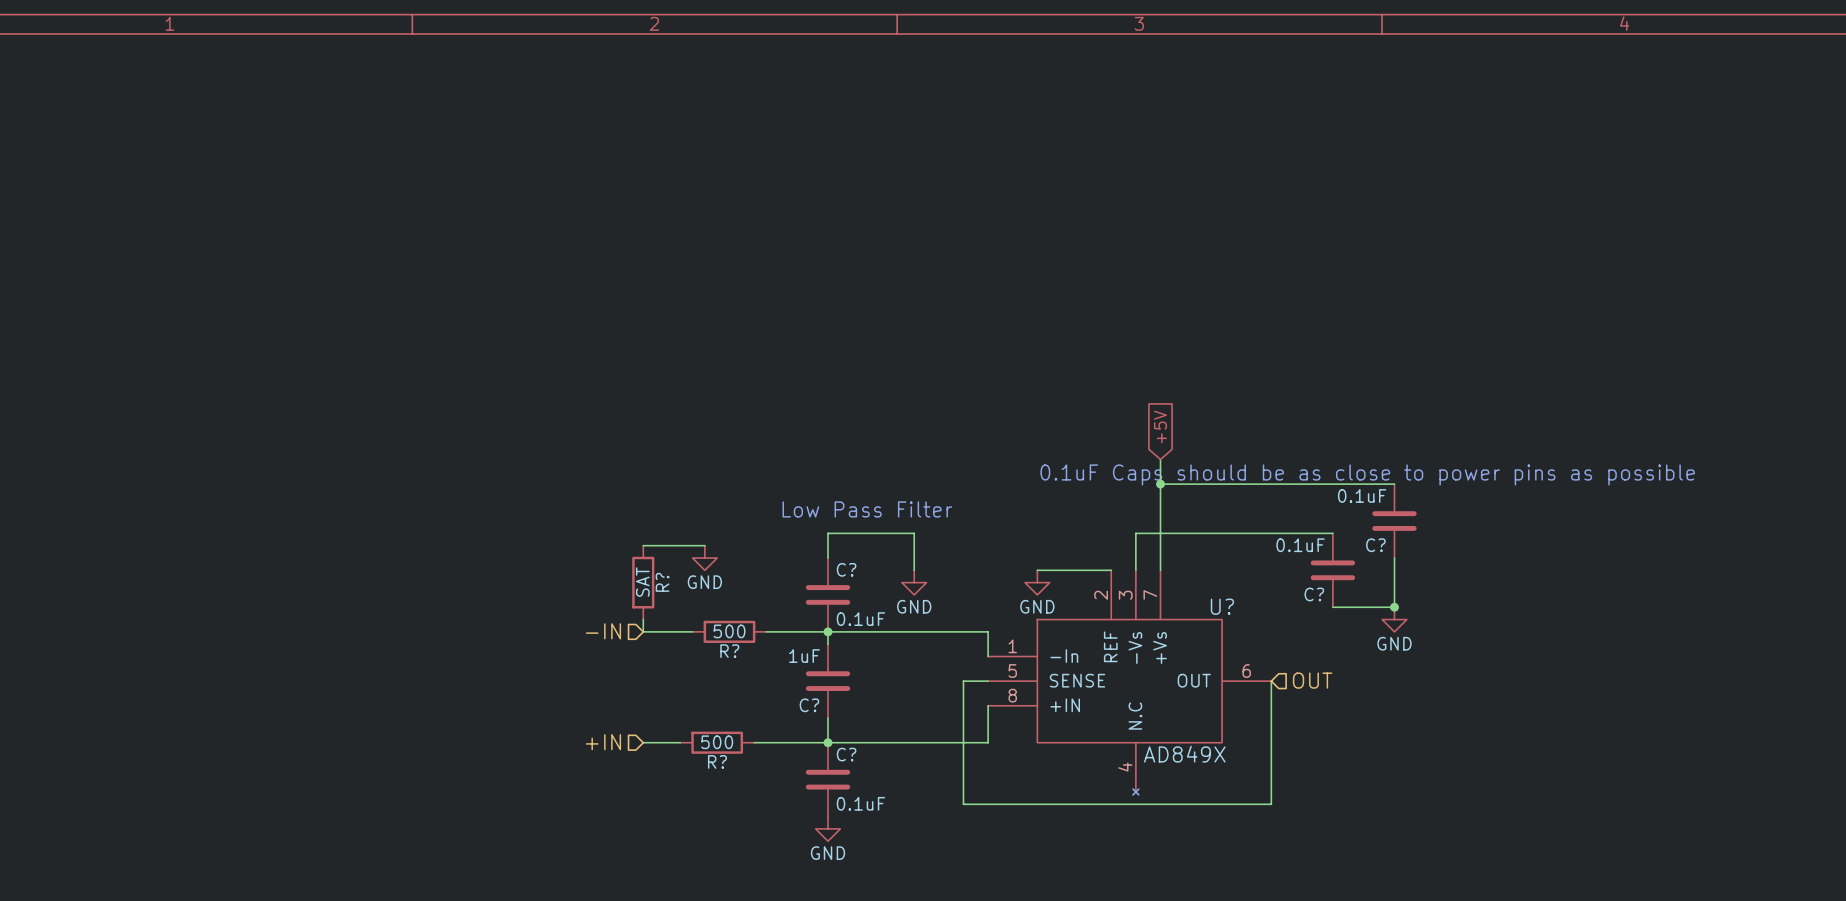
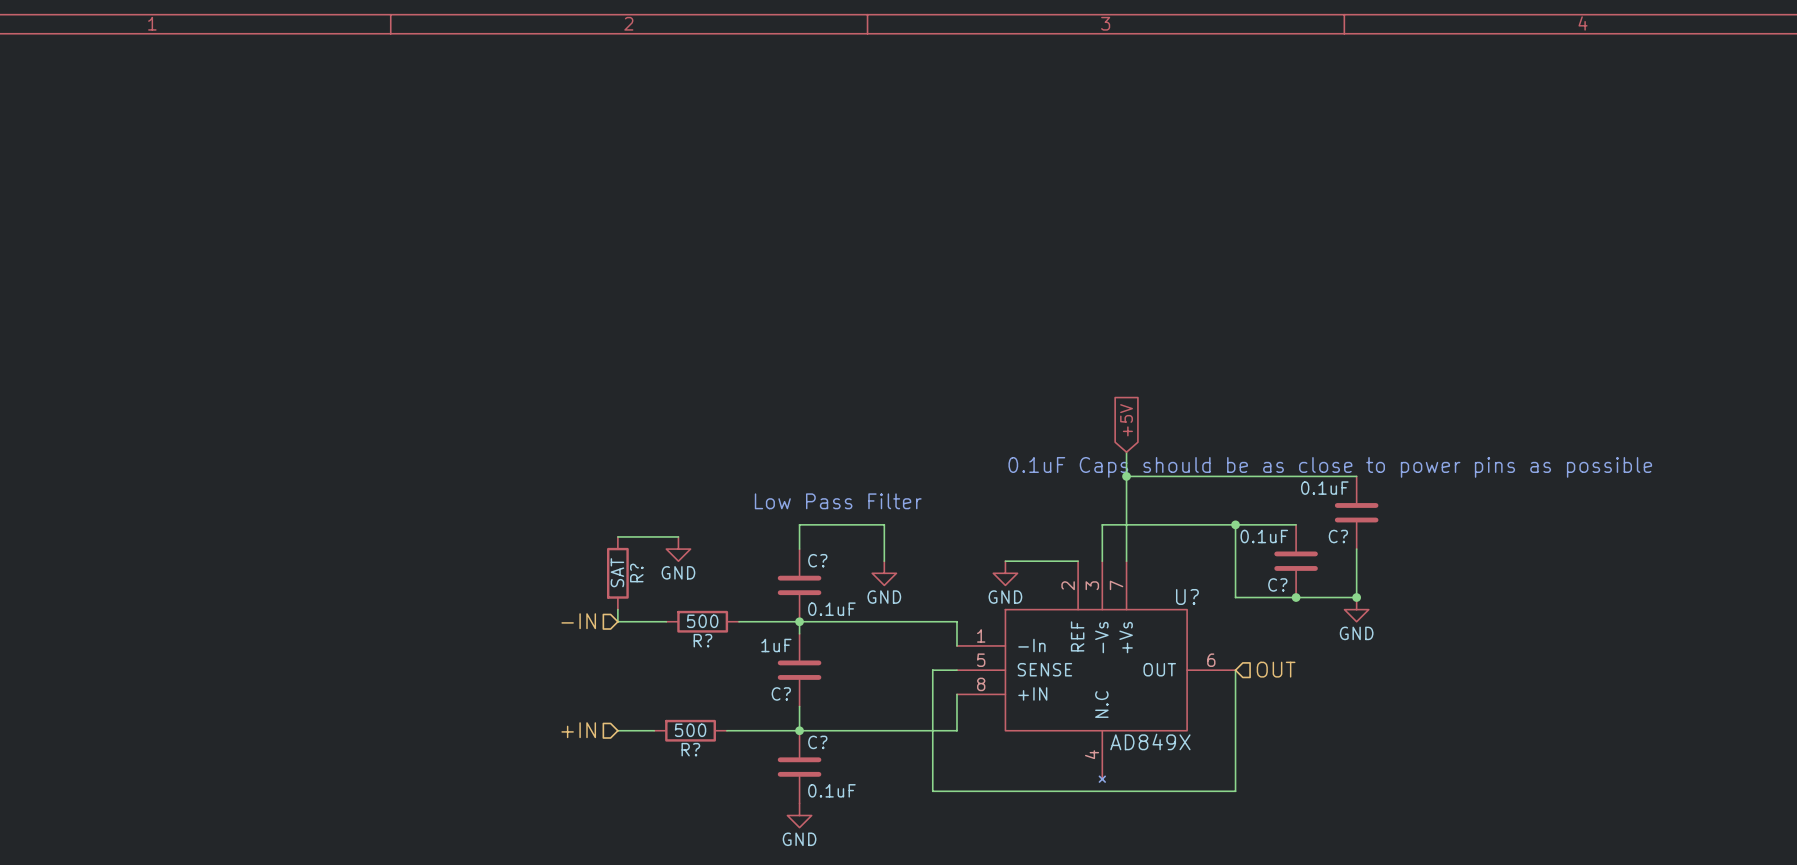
wire: none -> (1235, 524) (1235, 597) (1296, 597)
junction: none -> (1235, 524)
junction: none -> (1296, 597)

